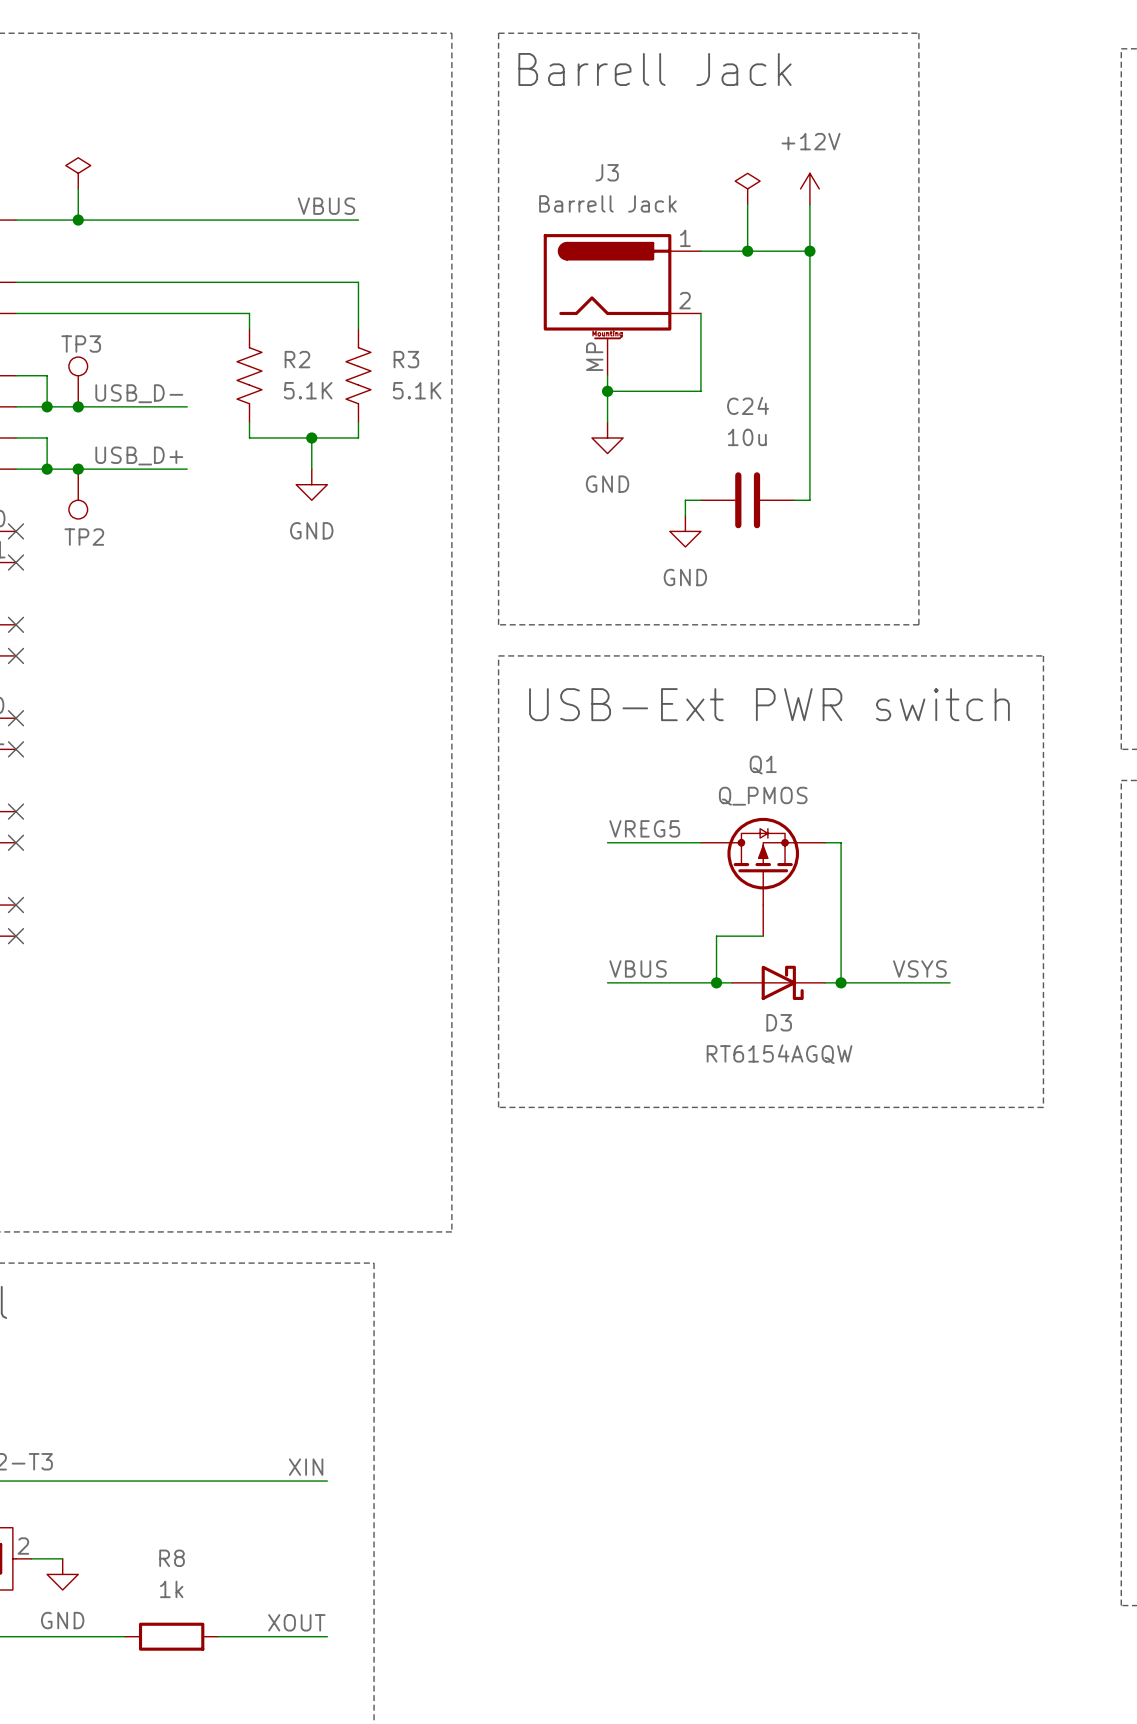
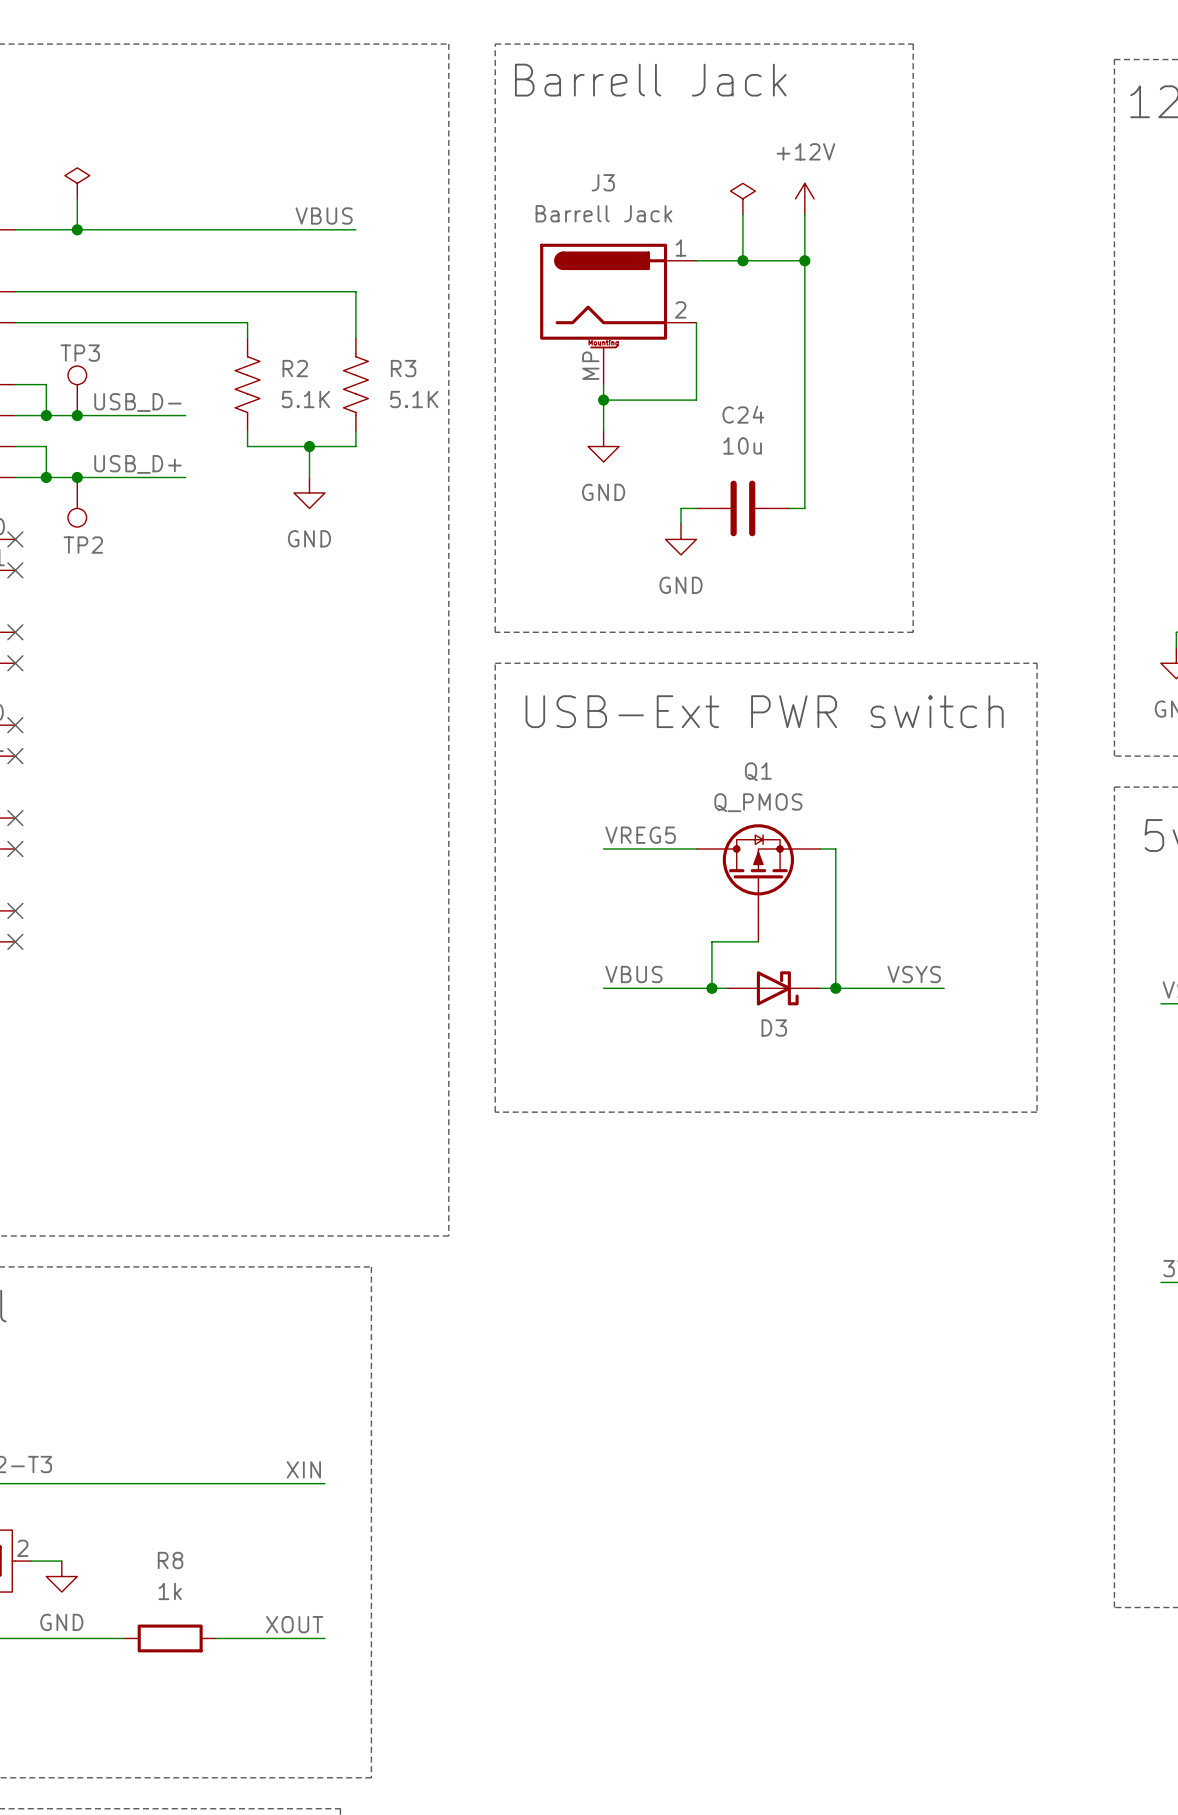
D3 value: RT6154AGQW (779, 1054) -> none

